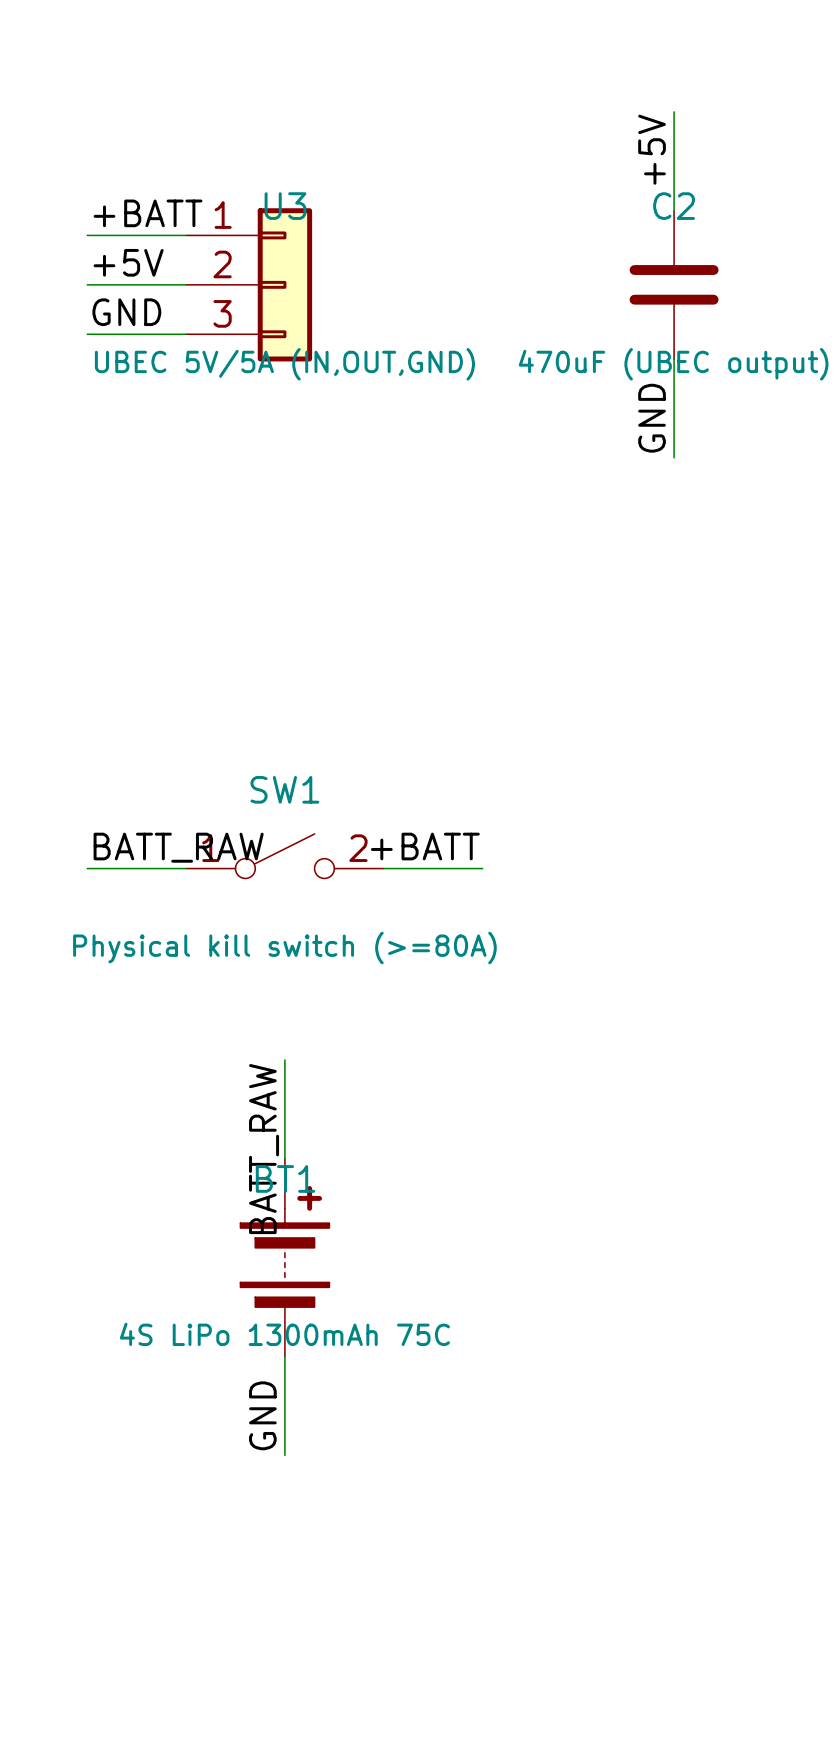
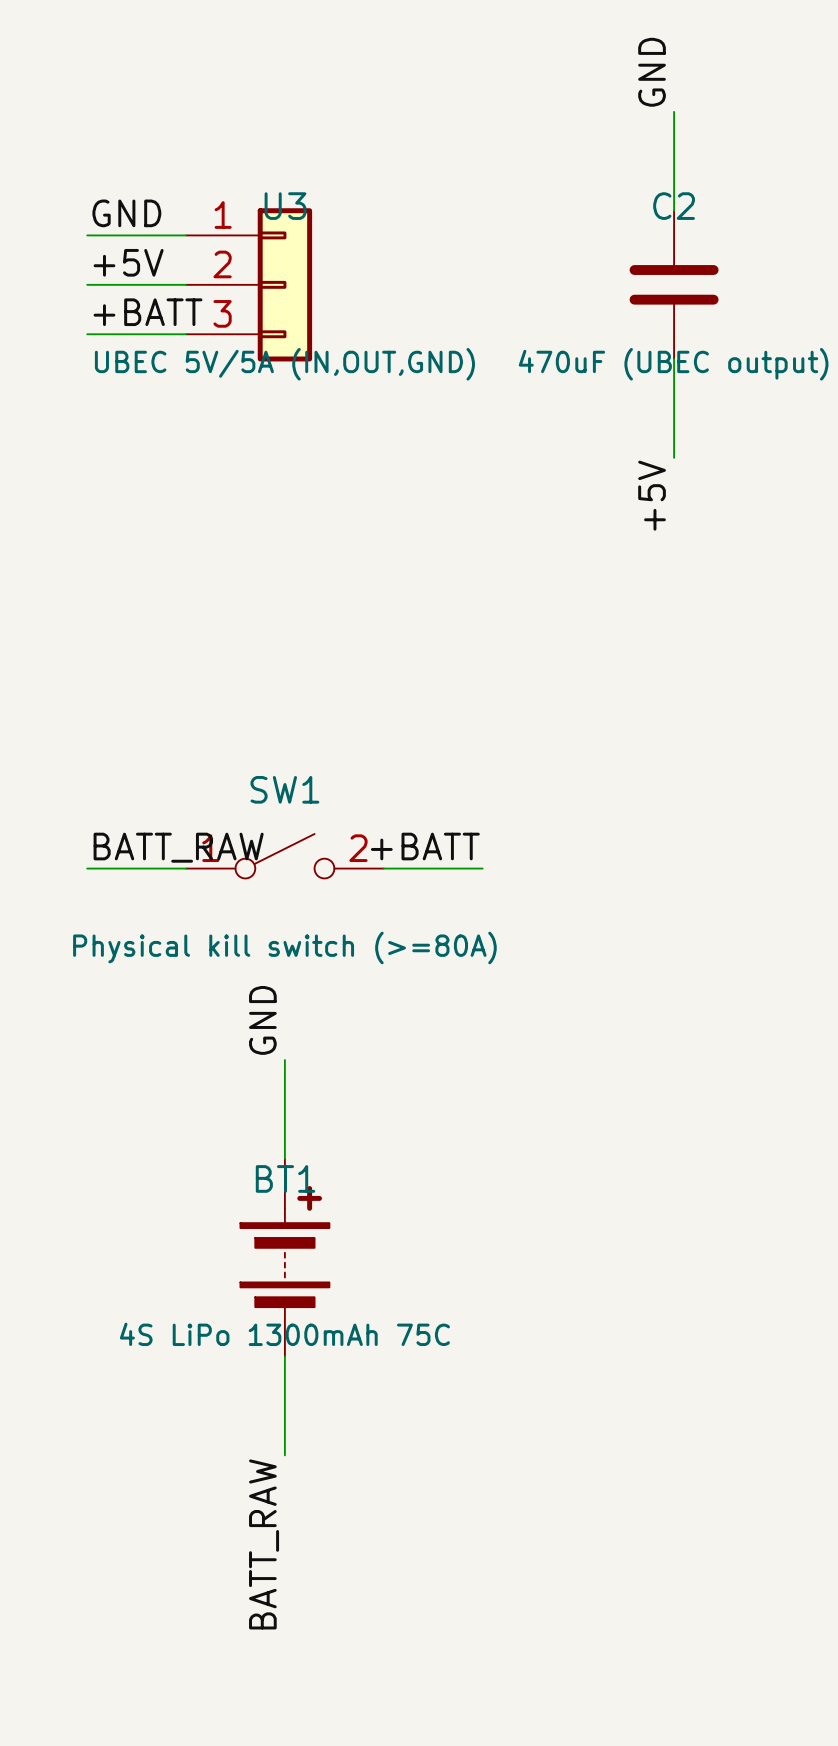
label: +5V (652, 149) -> GND (652, 72)
label: +BATT (148, 213) -> GND (126, 213)
label: GND (126, 312) -> +BATT (148, 312)
label: GND (652, 418) -> +5V (652, 495)
label: BATT_RAW (264, 1149) -> GND (262, 1020)
label: GND (262, 1415) -> BATT_RAW (264, 1544)

